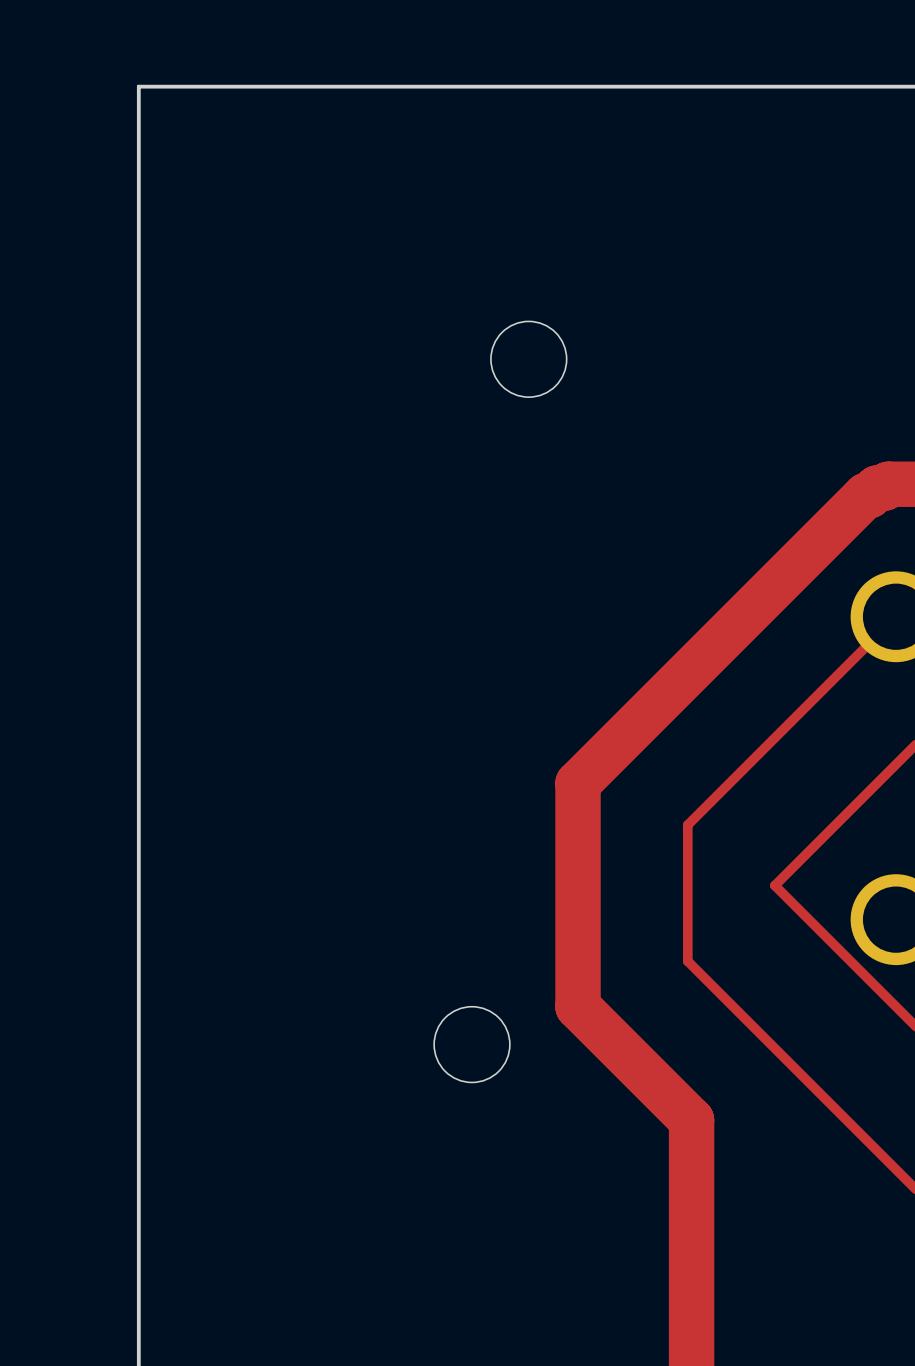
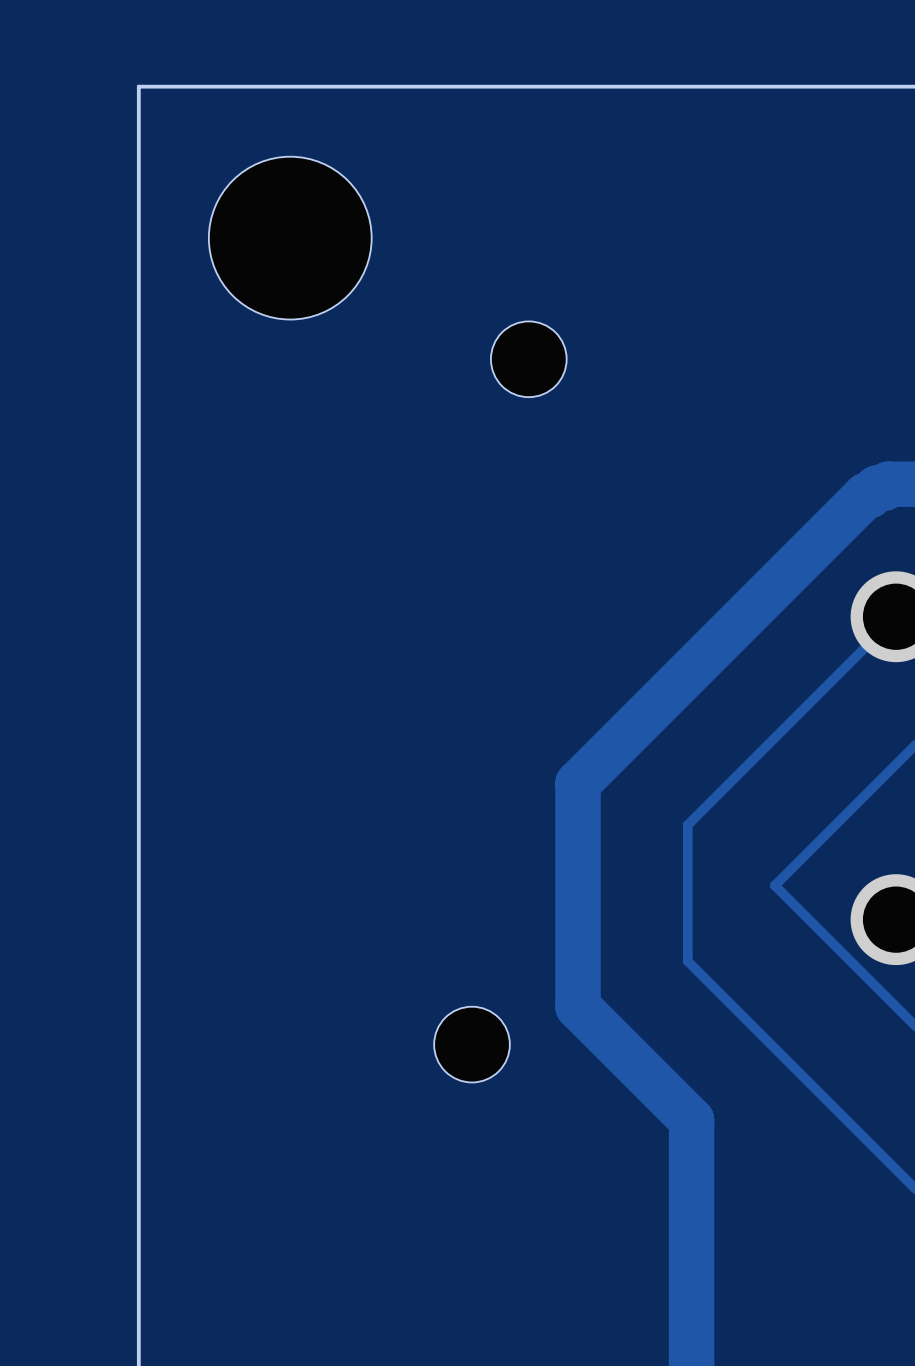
part: none -> (290, 238)

